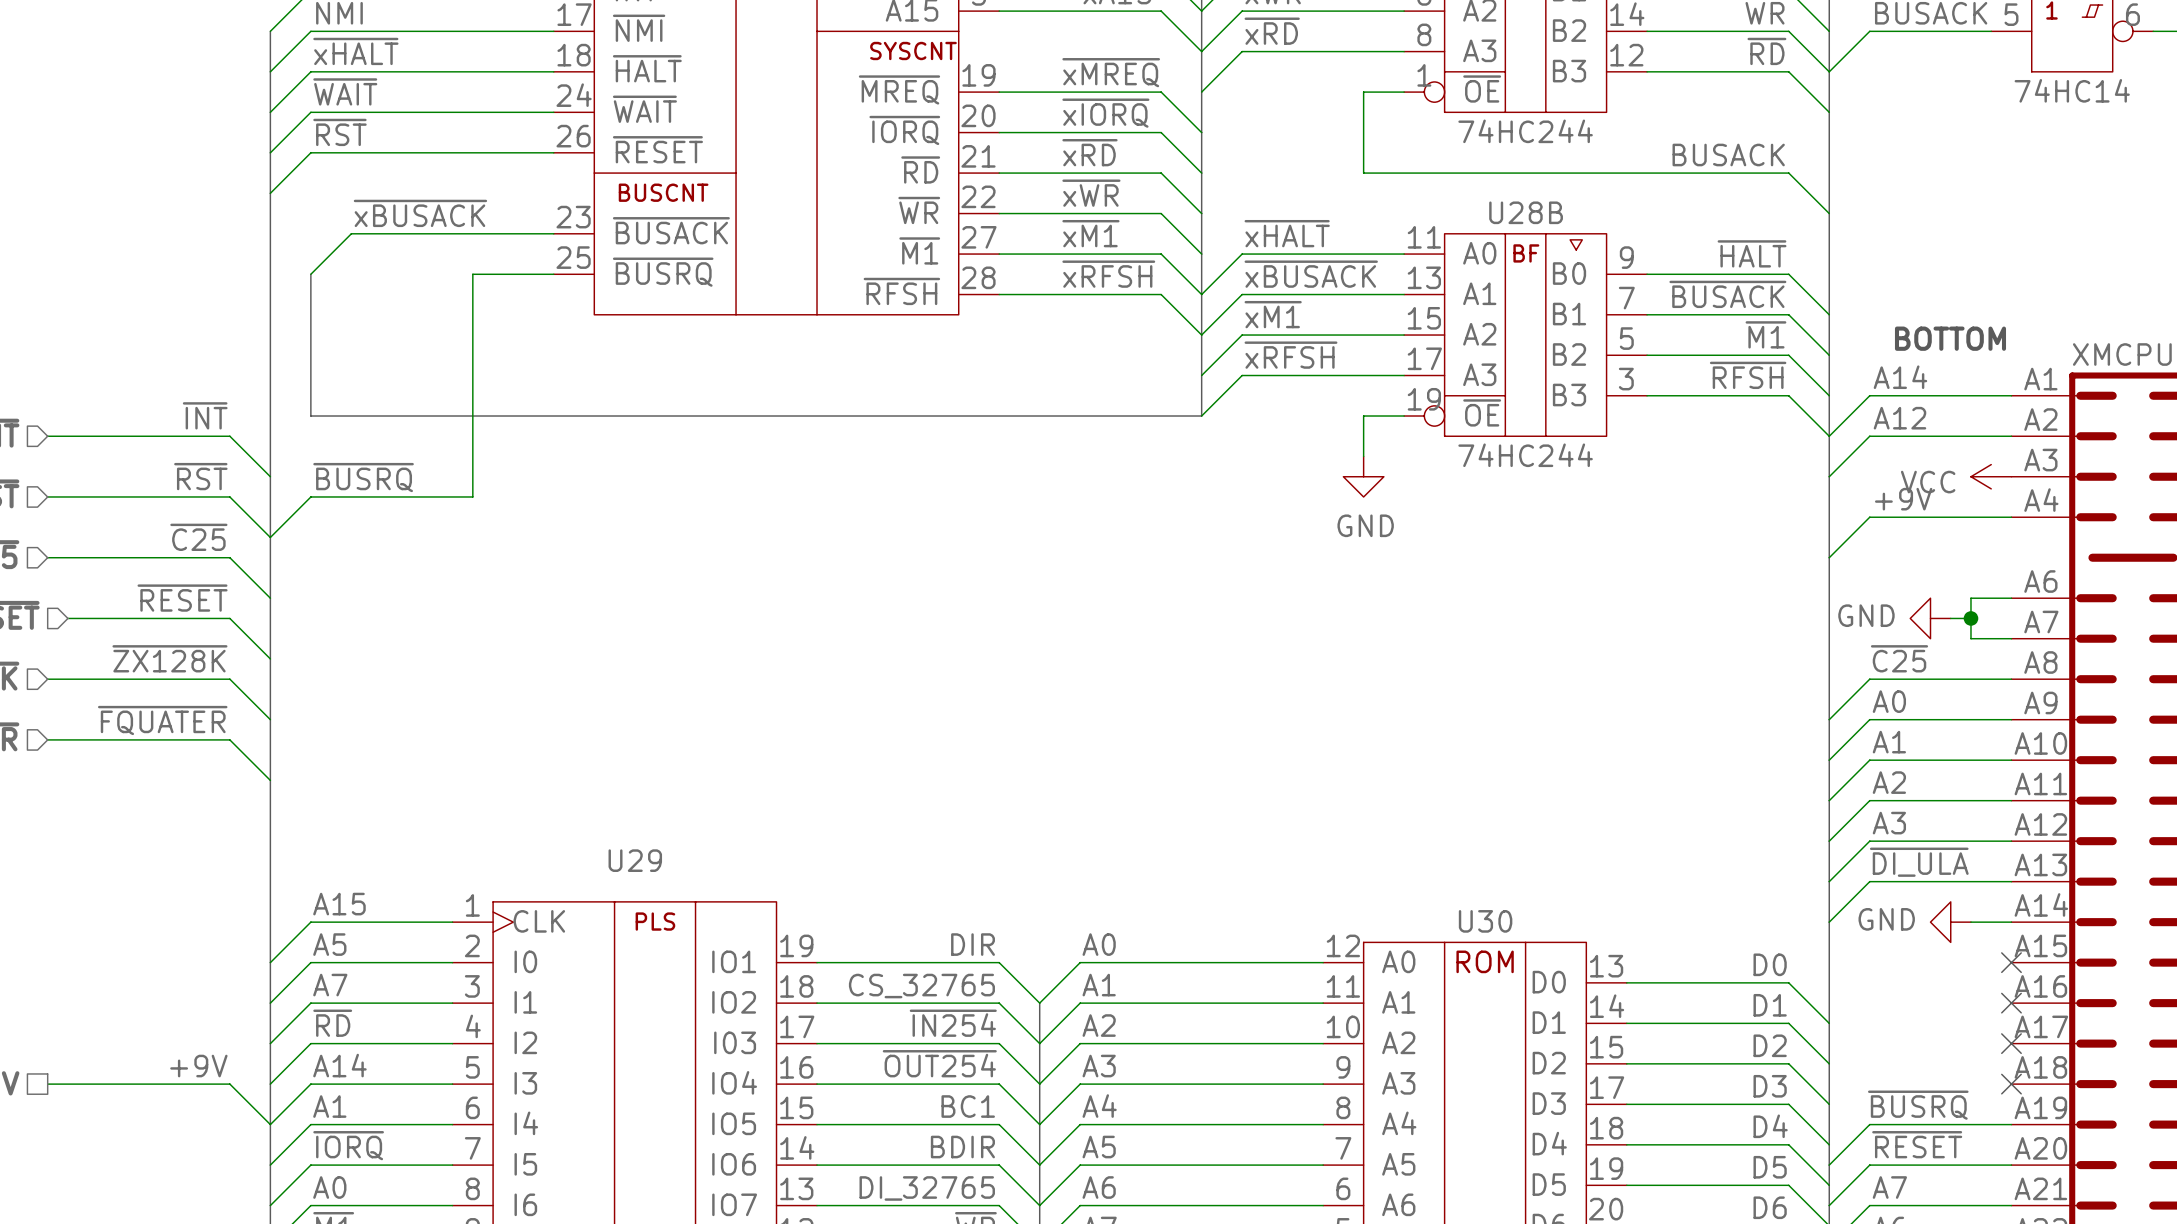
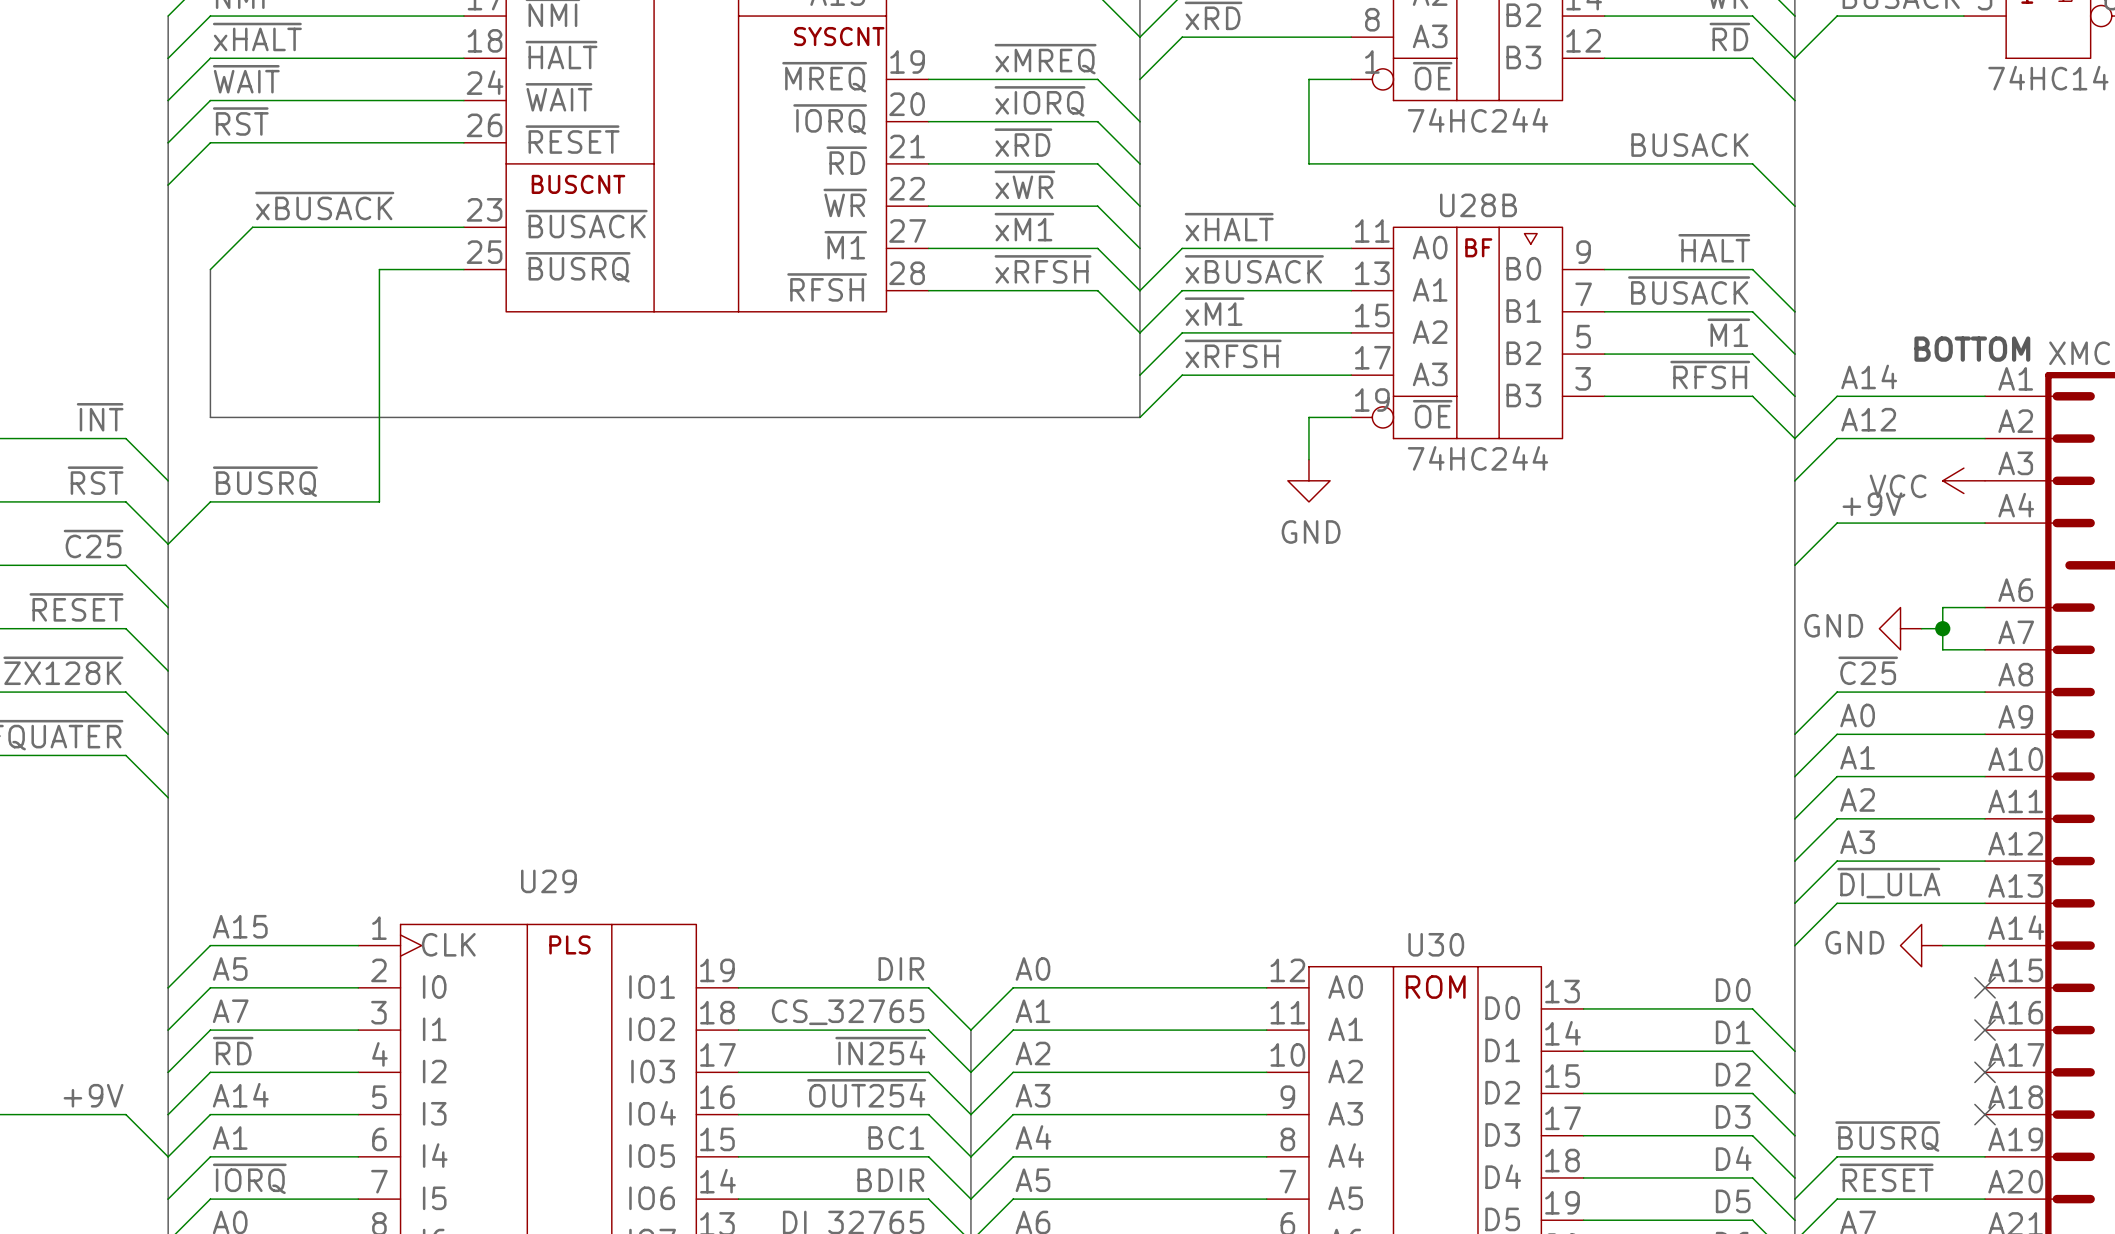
text position: BOTTOM (1950, 338) -> BOTTOM (1972, 349)

